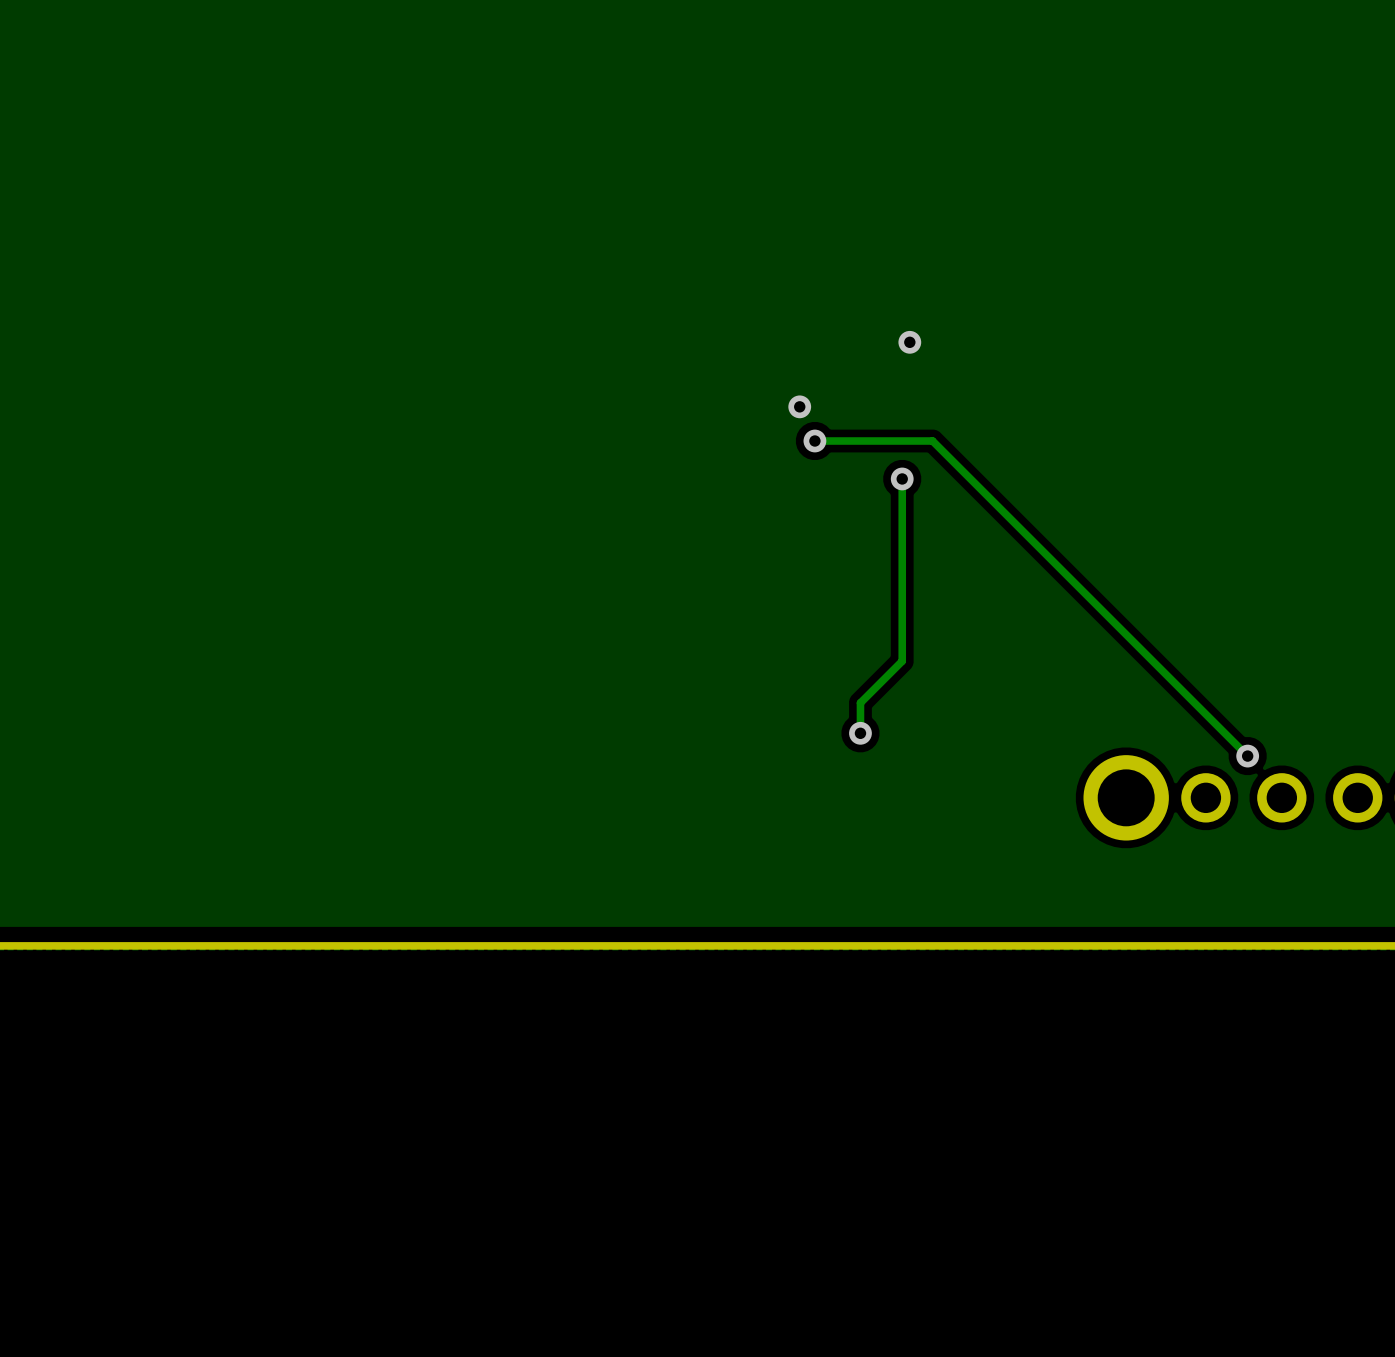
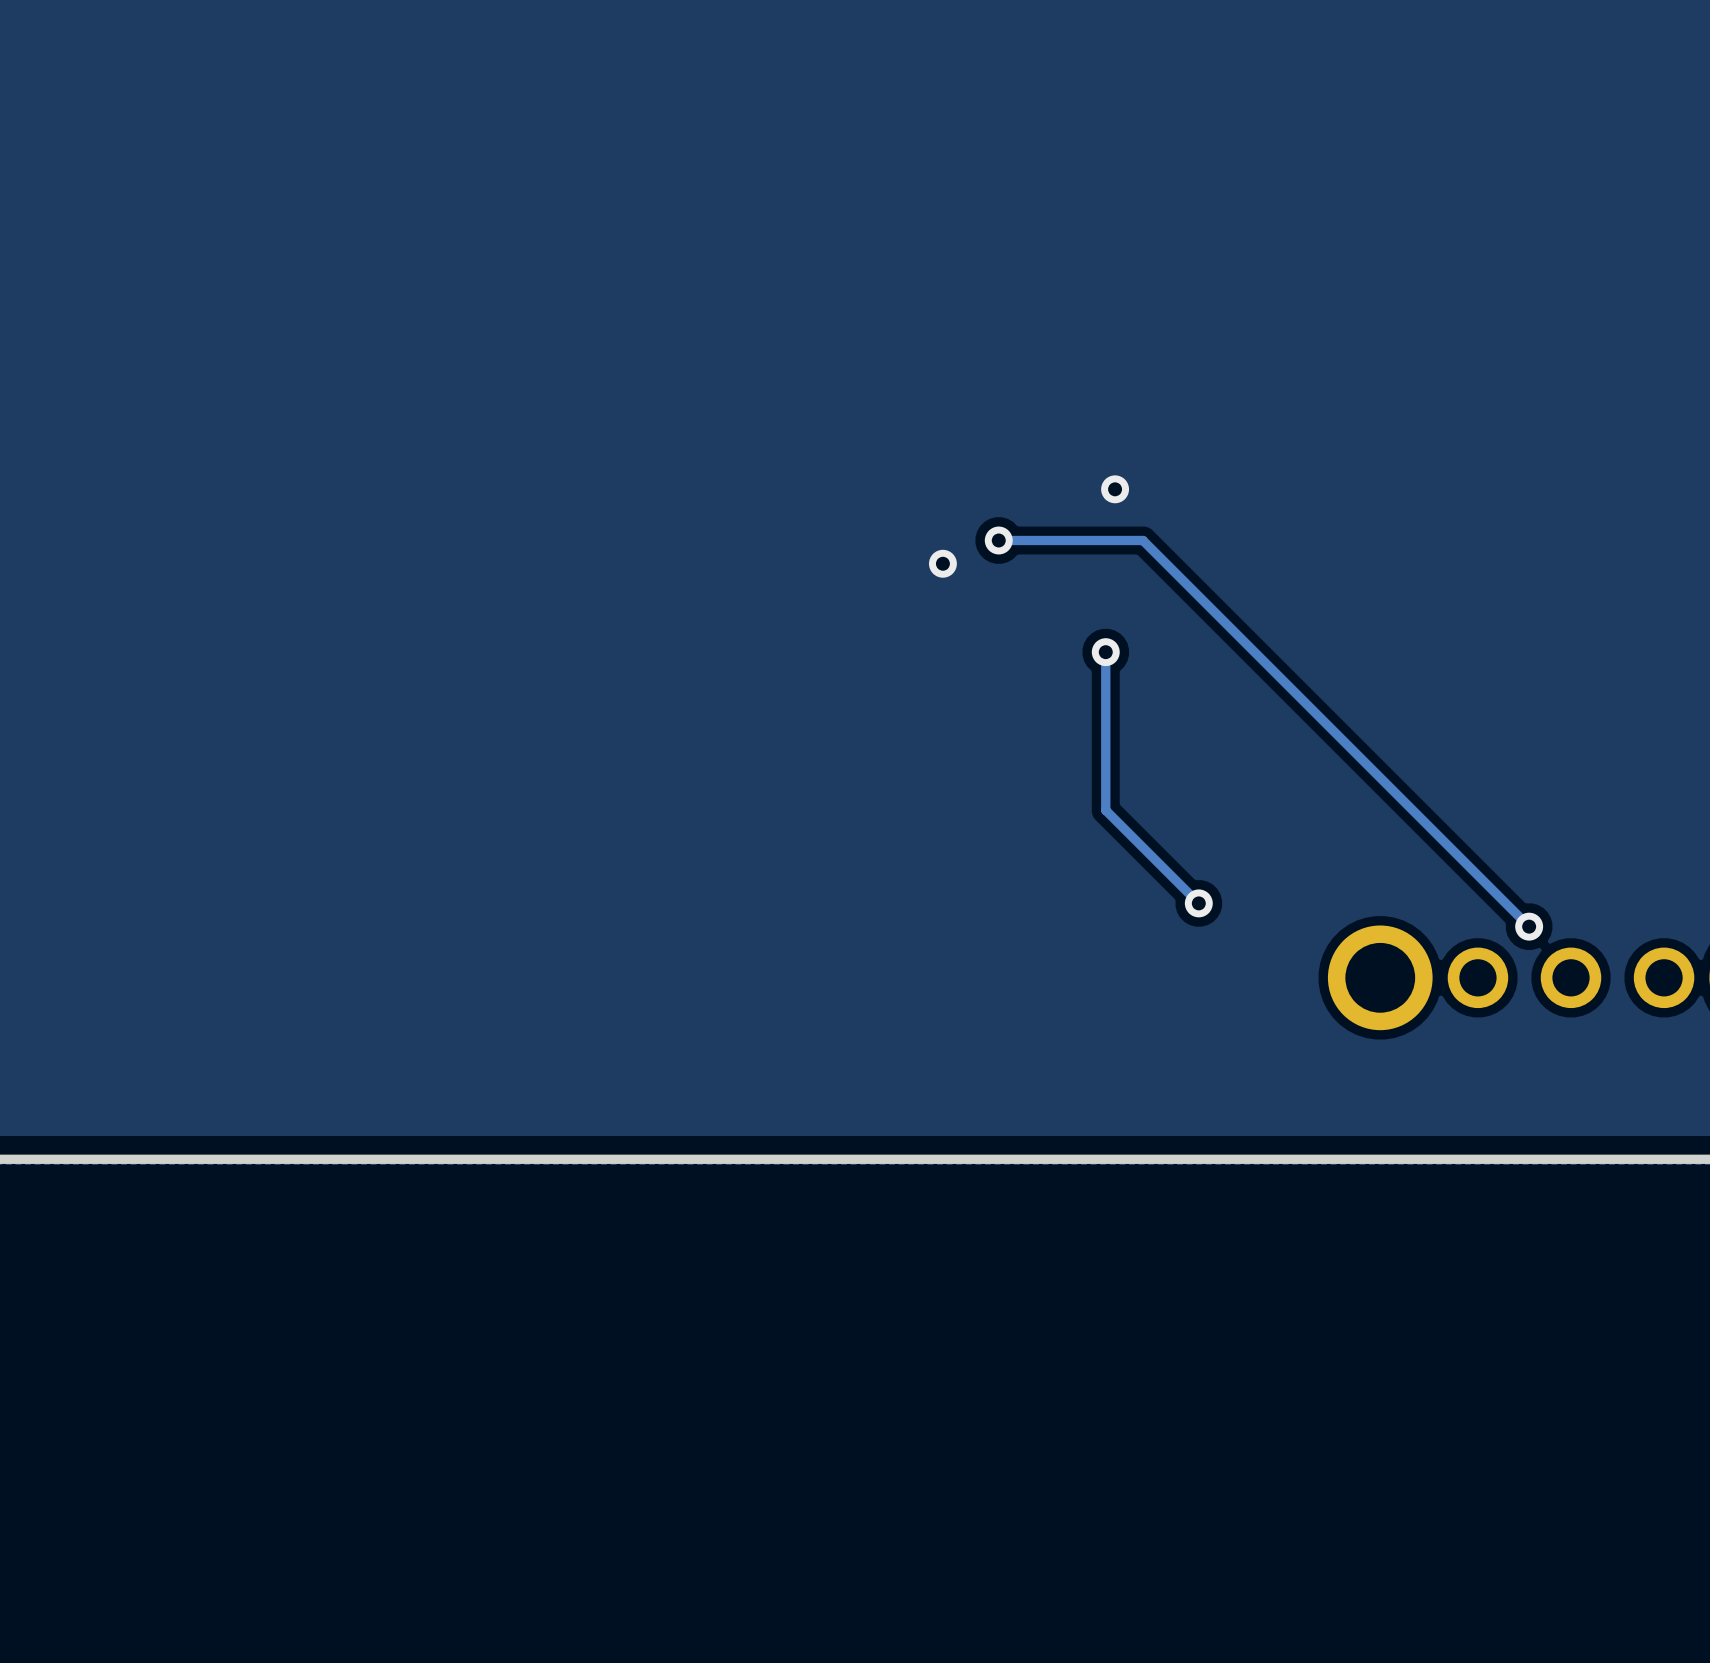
via: (909, 342) -> none
via: none -> (1115, 489)
via: (799, 406) -> none
via: none -> (942, 563)
track: (902, 478) (902, 532) -> none
via: (902, 478) -> none
via: none -> (1105, 652)
track: (902, 661) (860, 702) (860, 733) -> (1105, 810) (1198, 903)
via: (860, 733) -> none
via: none -> (1198, 903)

